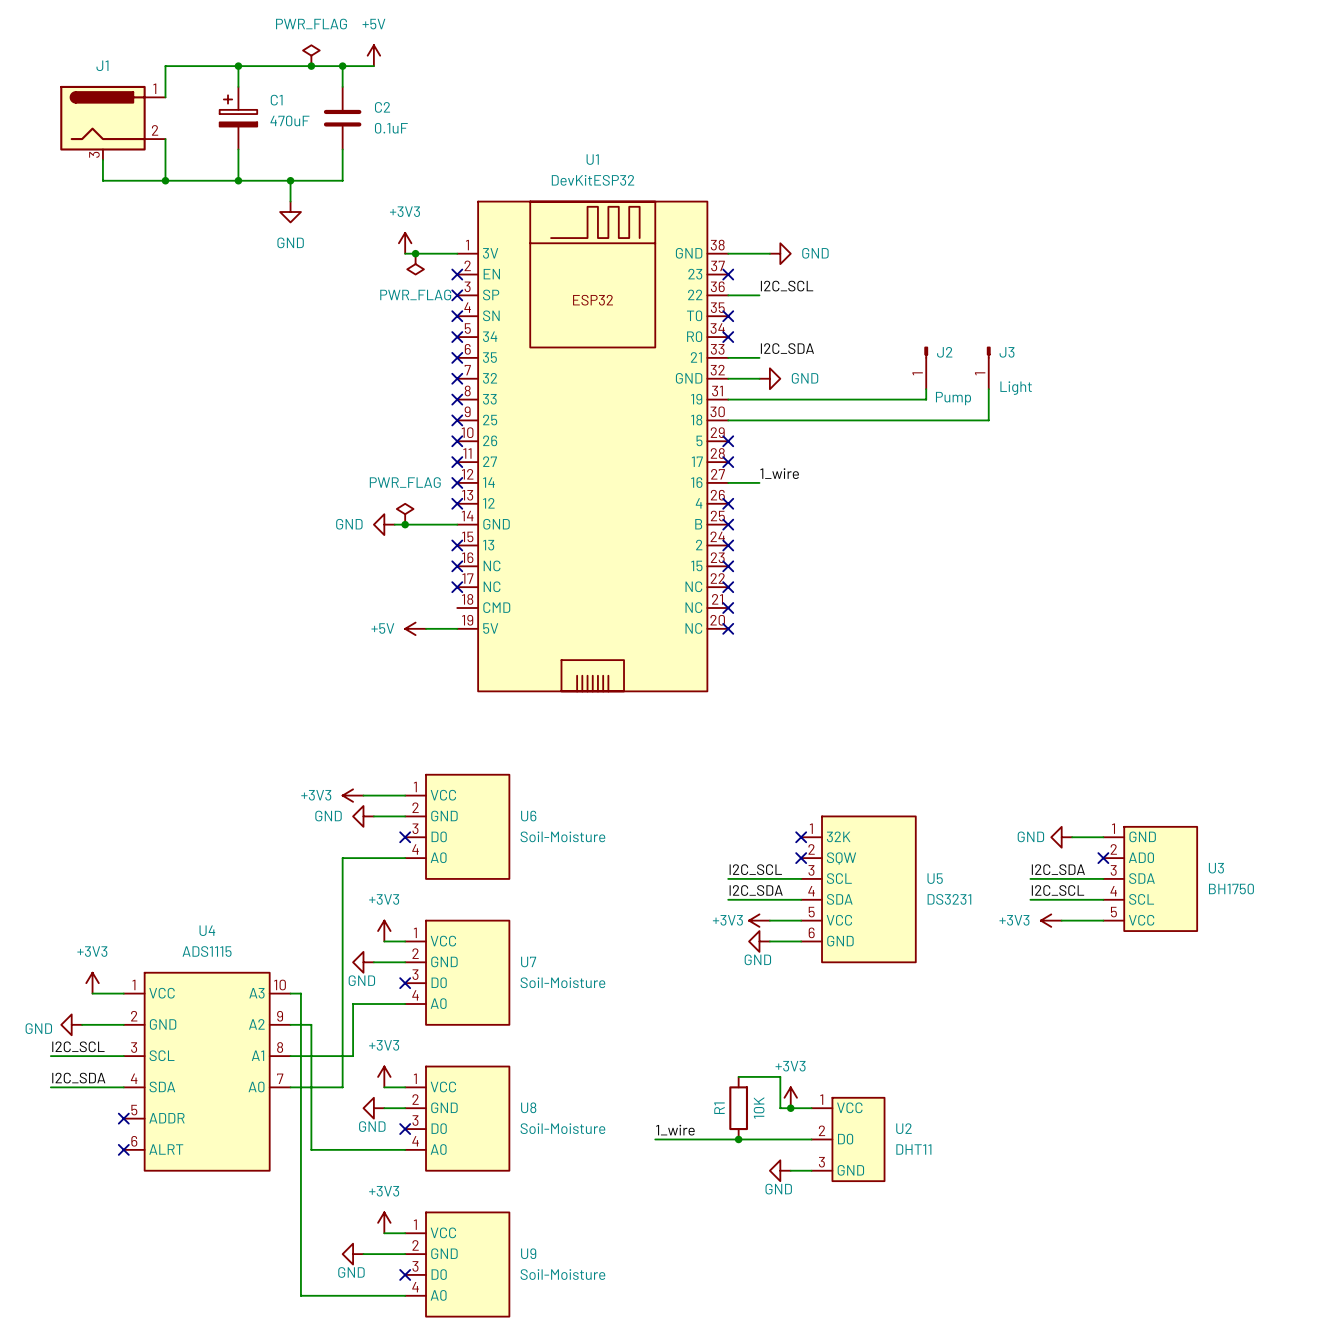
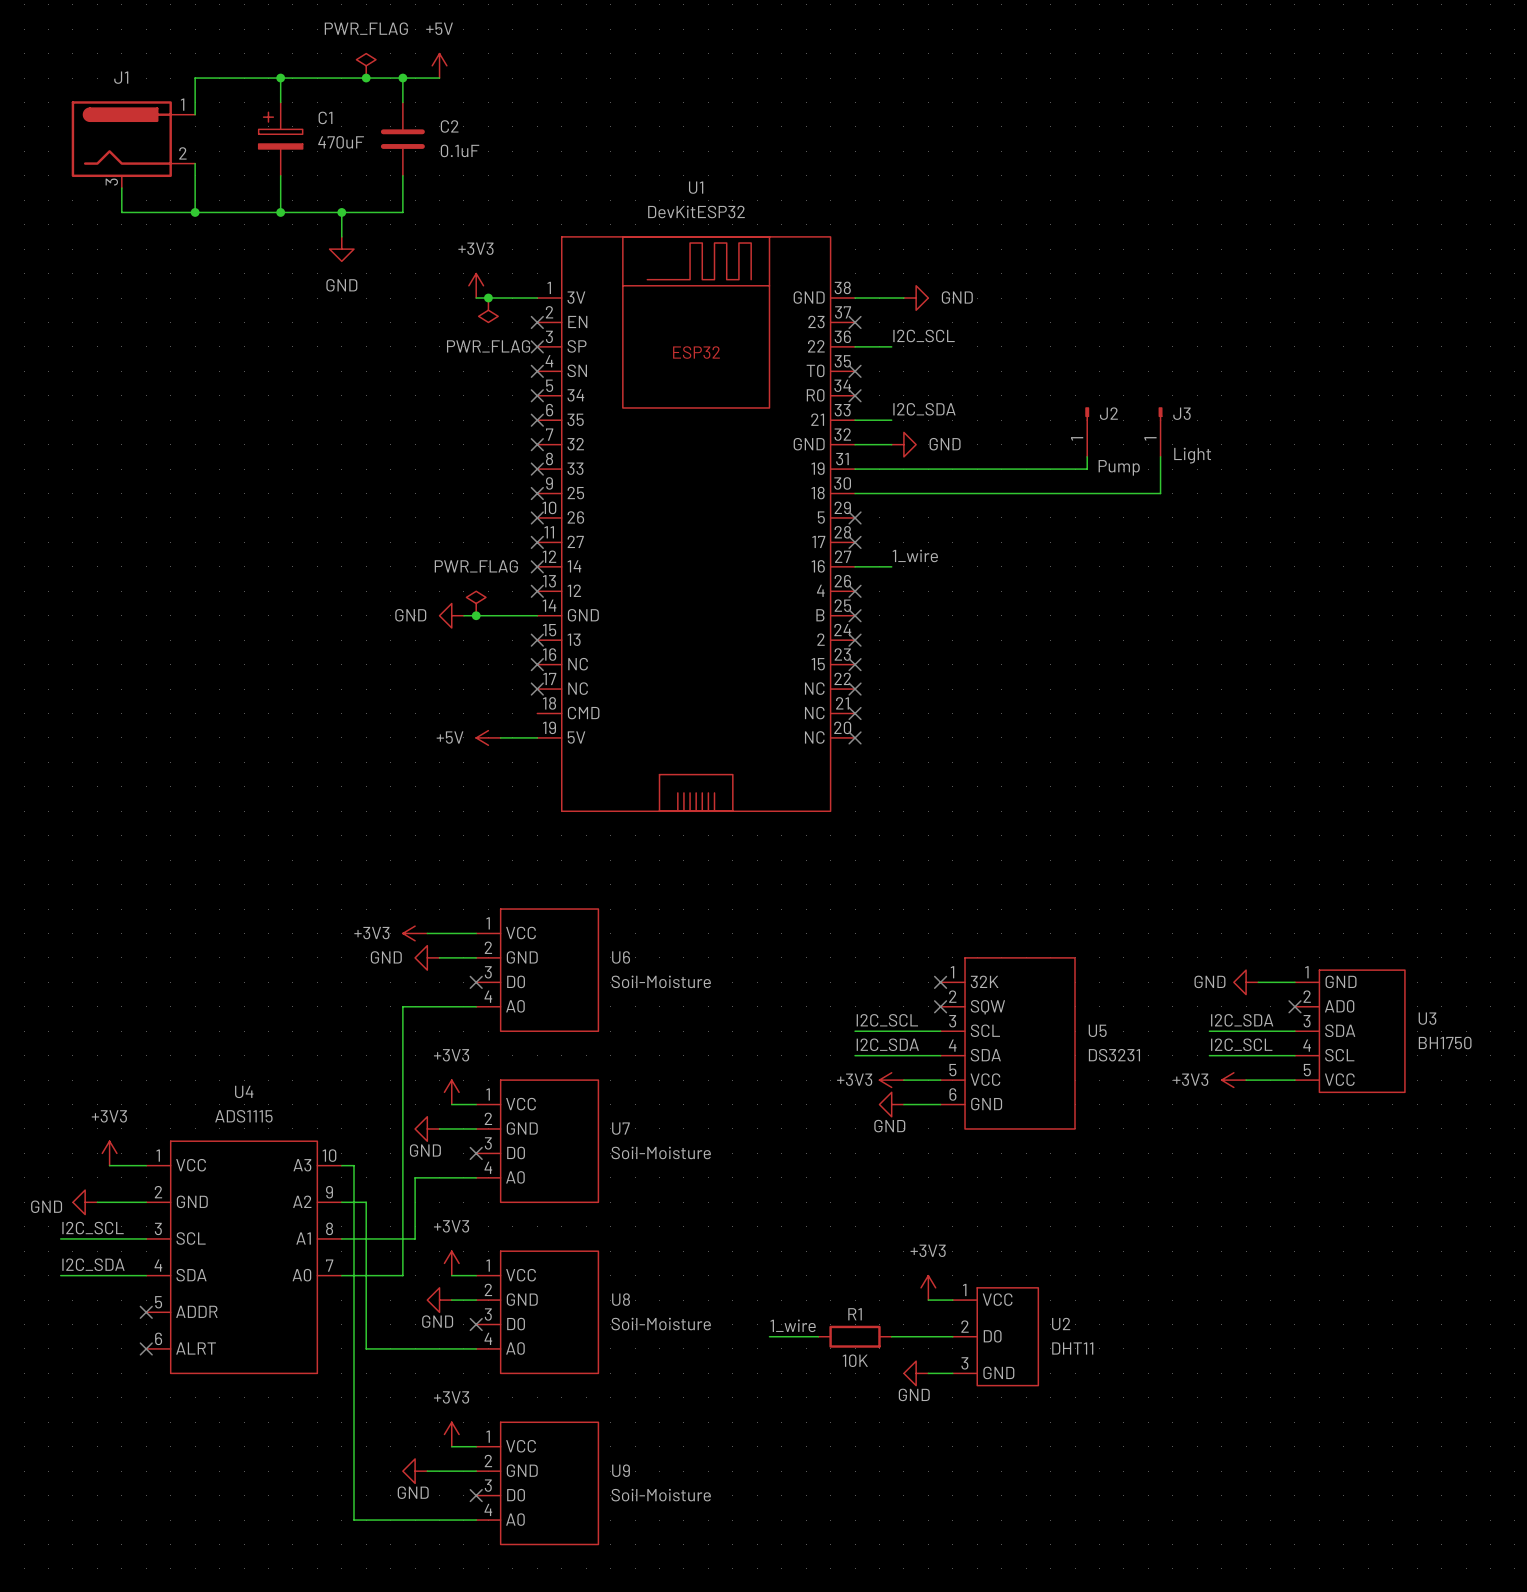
wire: (738, 1076) (780, 1076) (780, 1108) (790, 1108) -> none
R1 rotation: 0° (738, 1108) -> 90° clockwise (855, 1336)
junction: (790, 1108) -> none
wire: (696, 1139) (759, 1139) -> none
junction: (738, 1139) -> none

